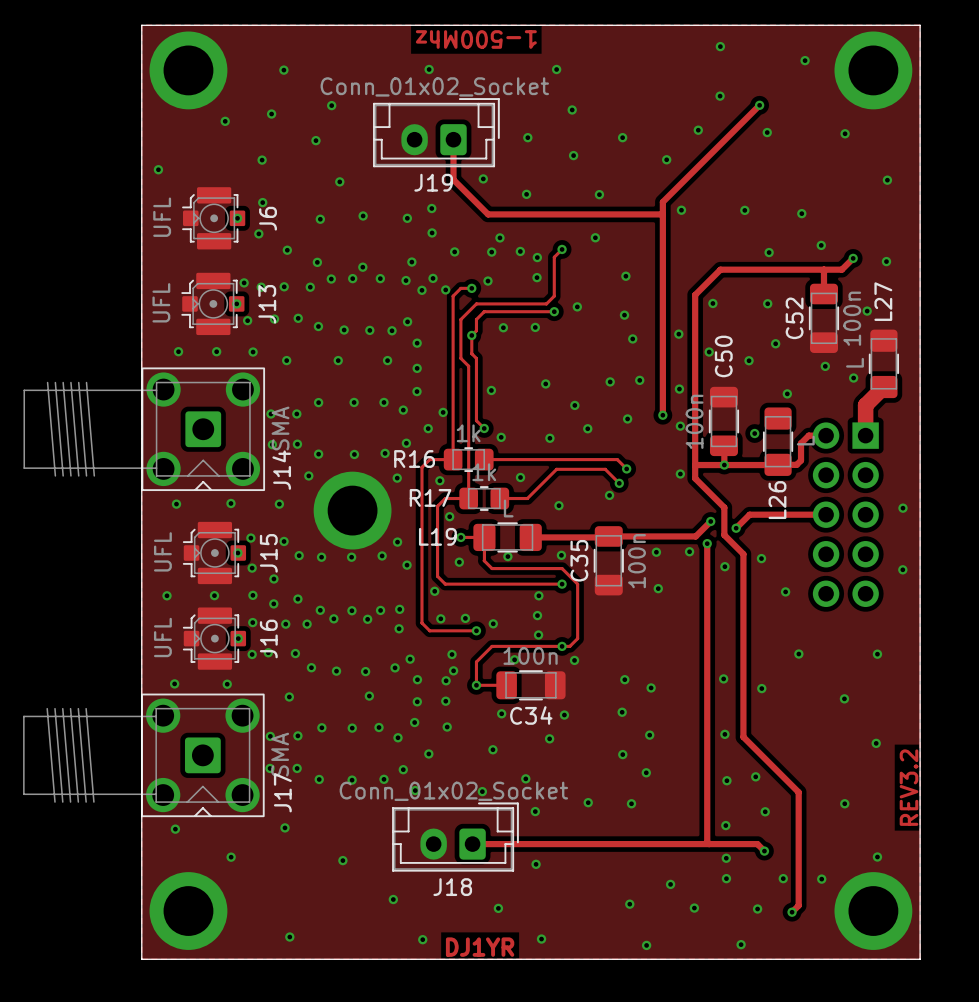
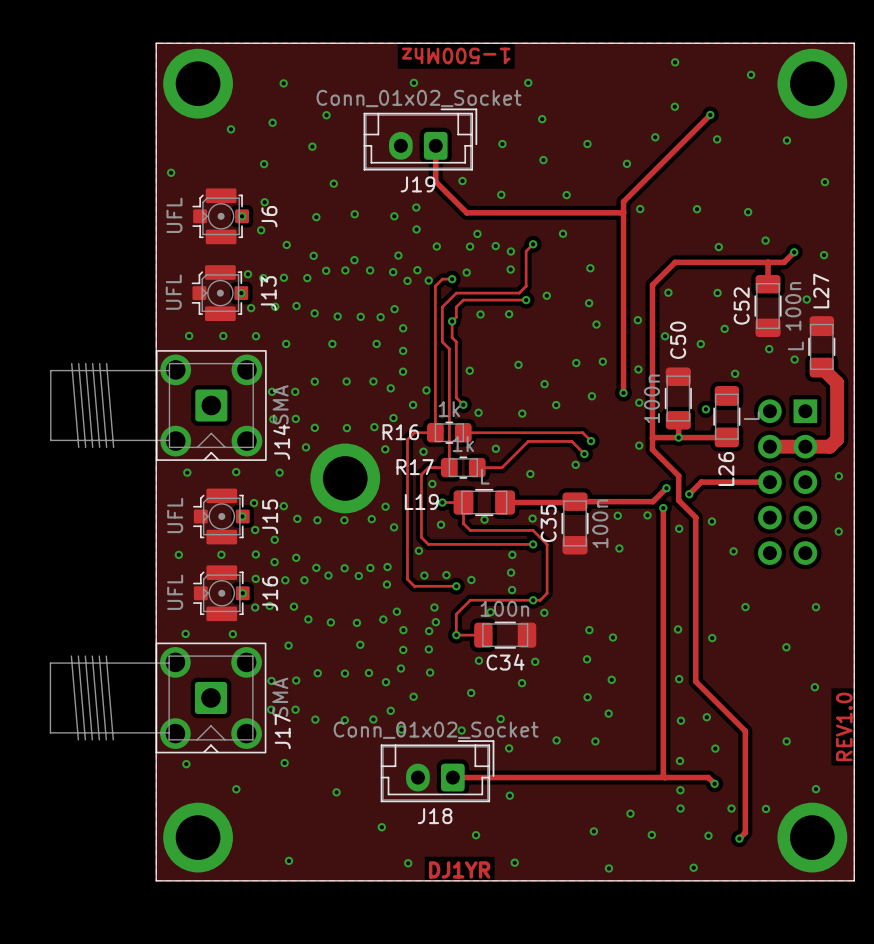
track: (883, 387) (865, 405) (865, 435) -> (821, 367) (837, 382) (837, 439) (829, 446) (769, 446)
track: (826, 435) (808, 435) (801, 443) (801, 460) (796, 464) (778, 464) -> none
text: REV3.2 (909, 787) -> REV1.0 (844, 726)

